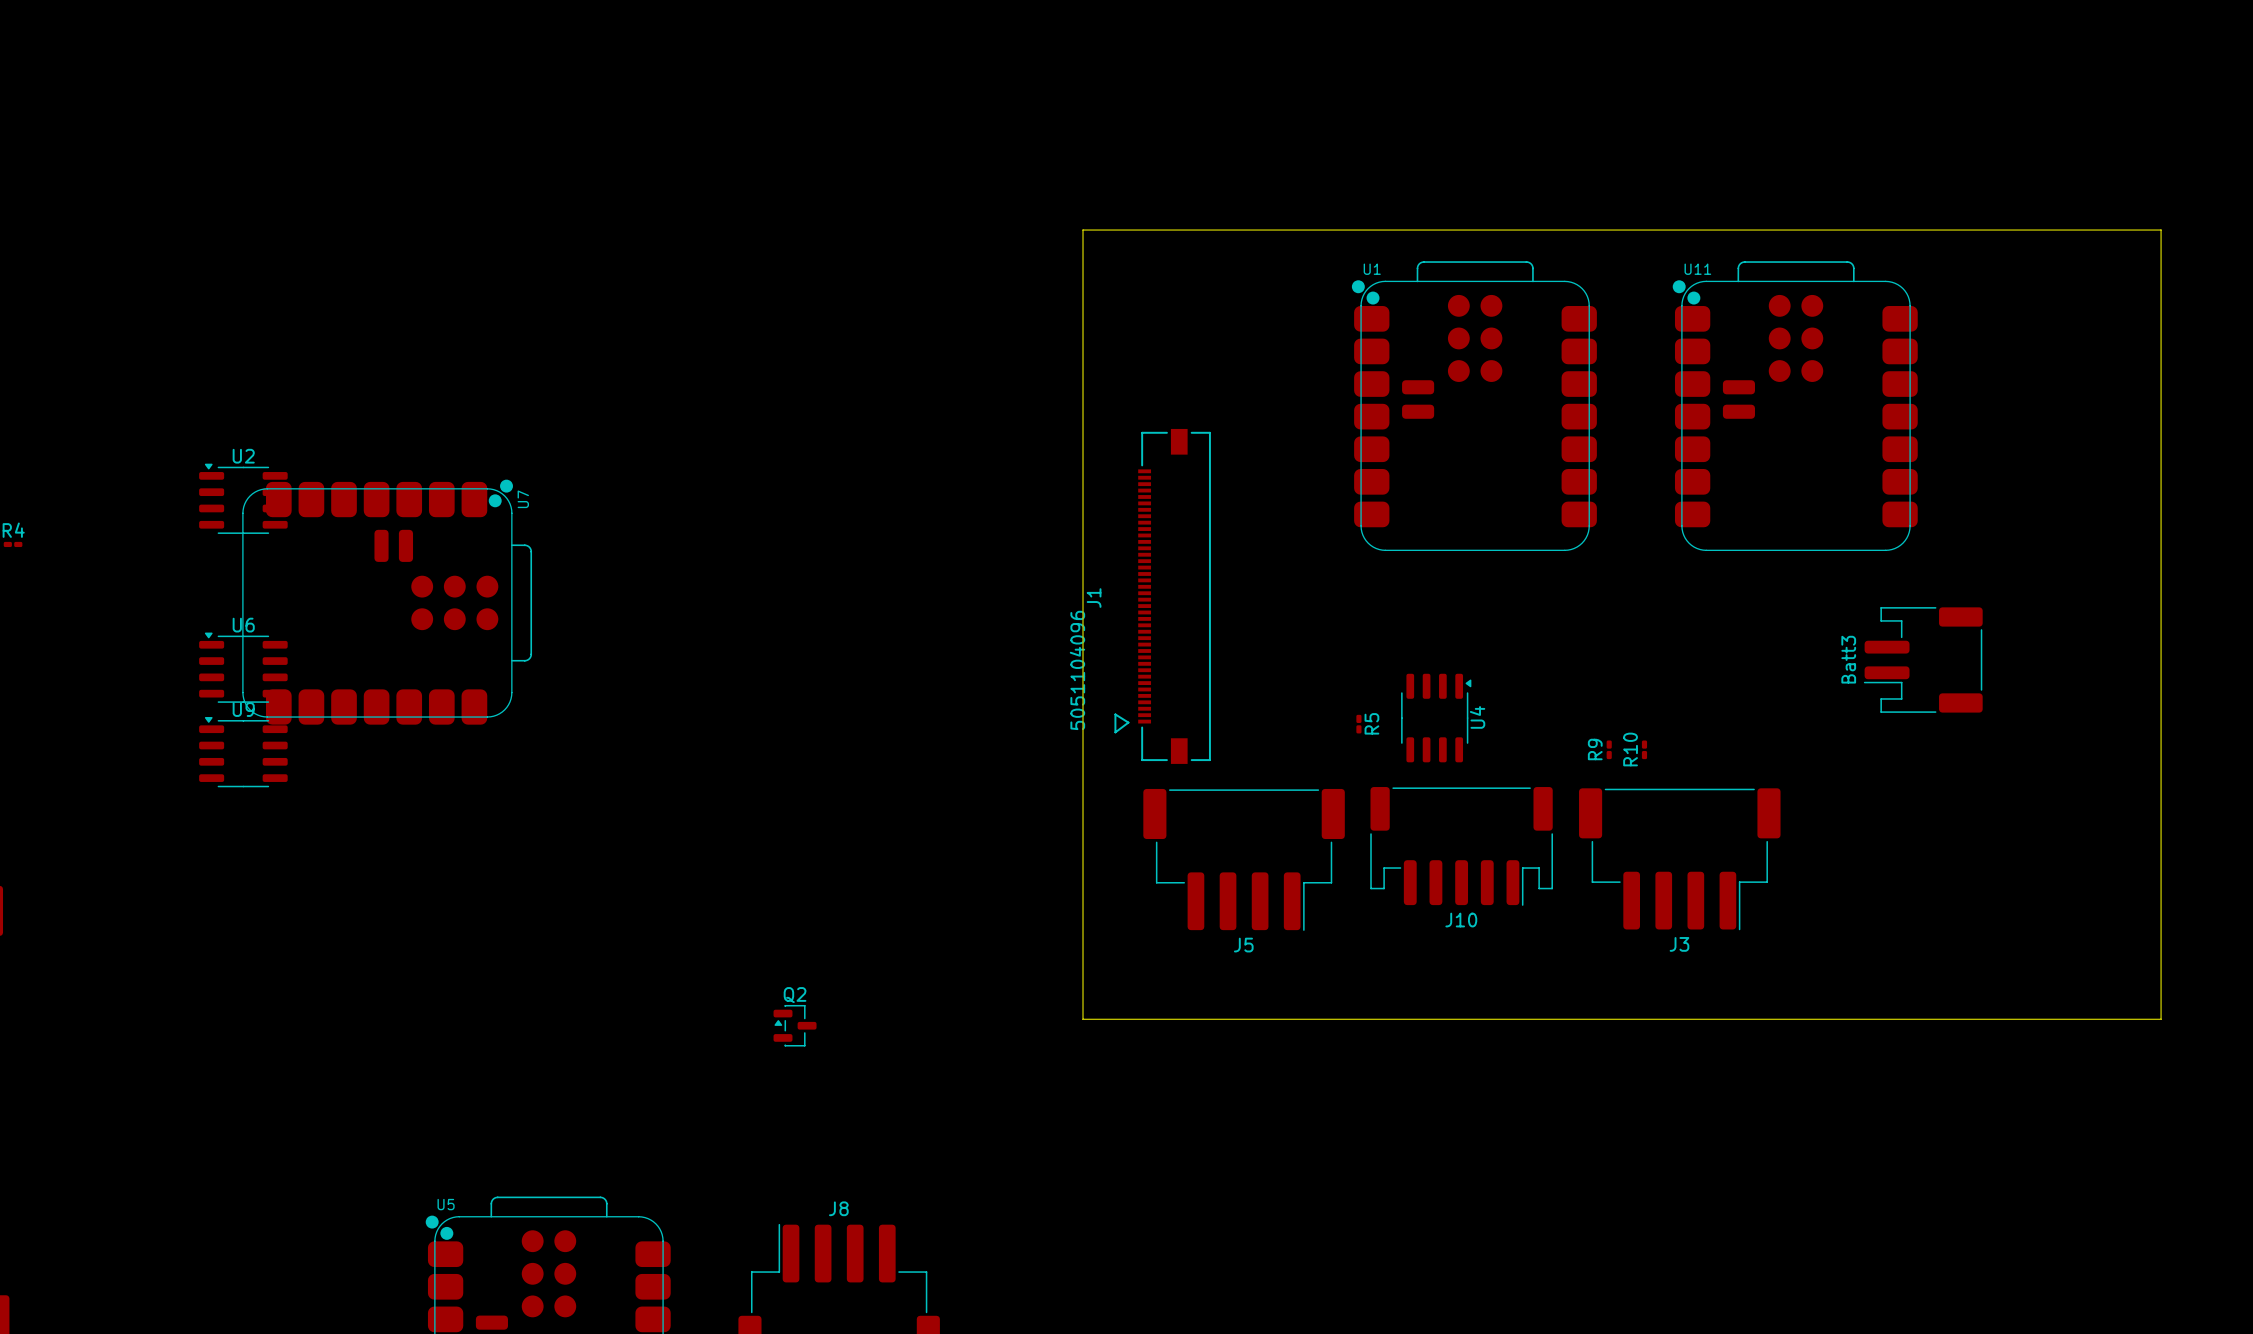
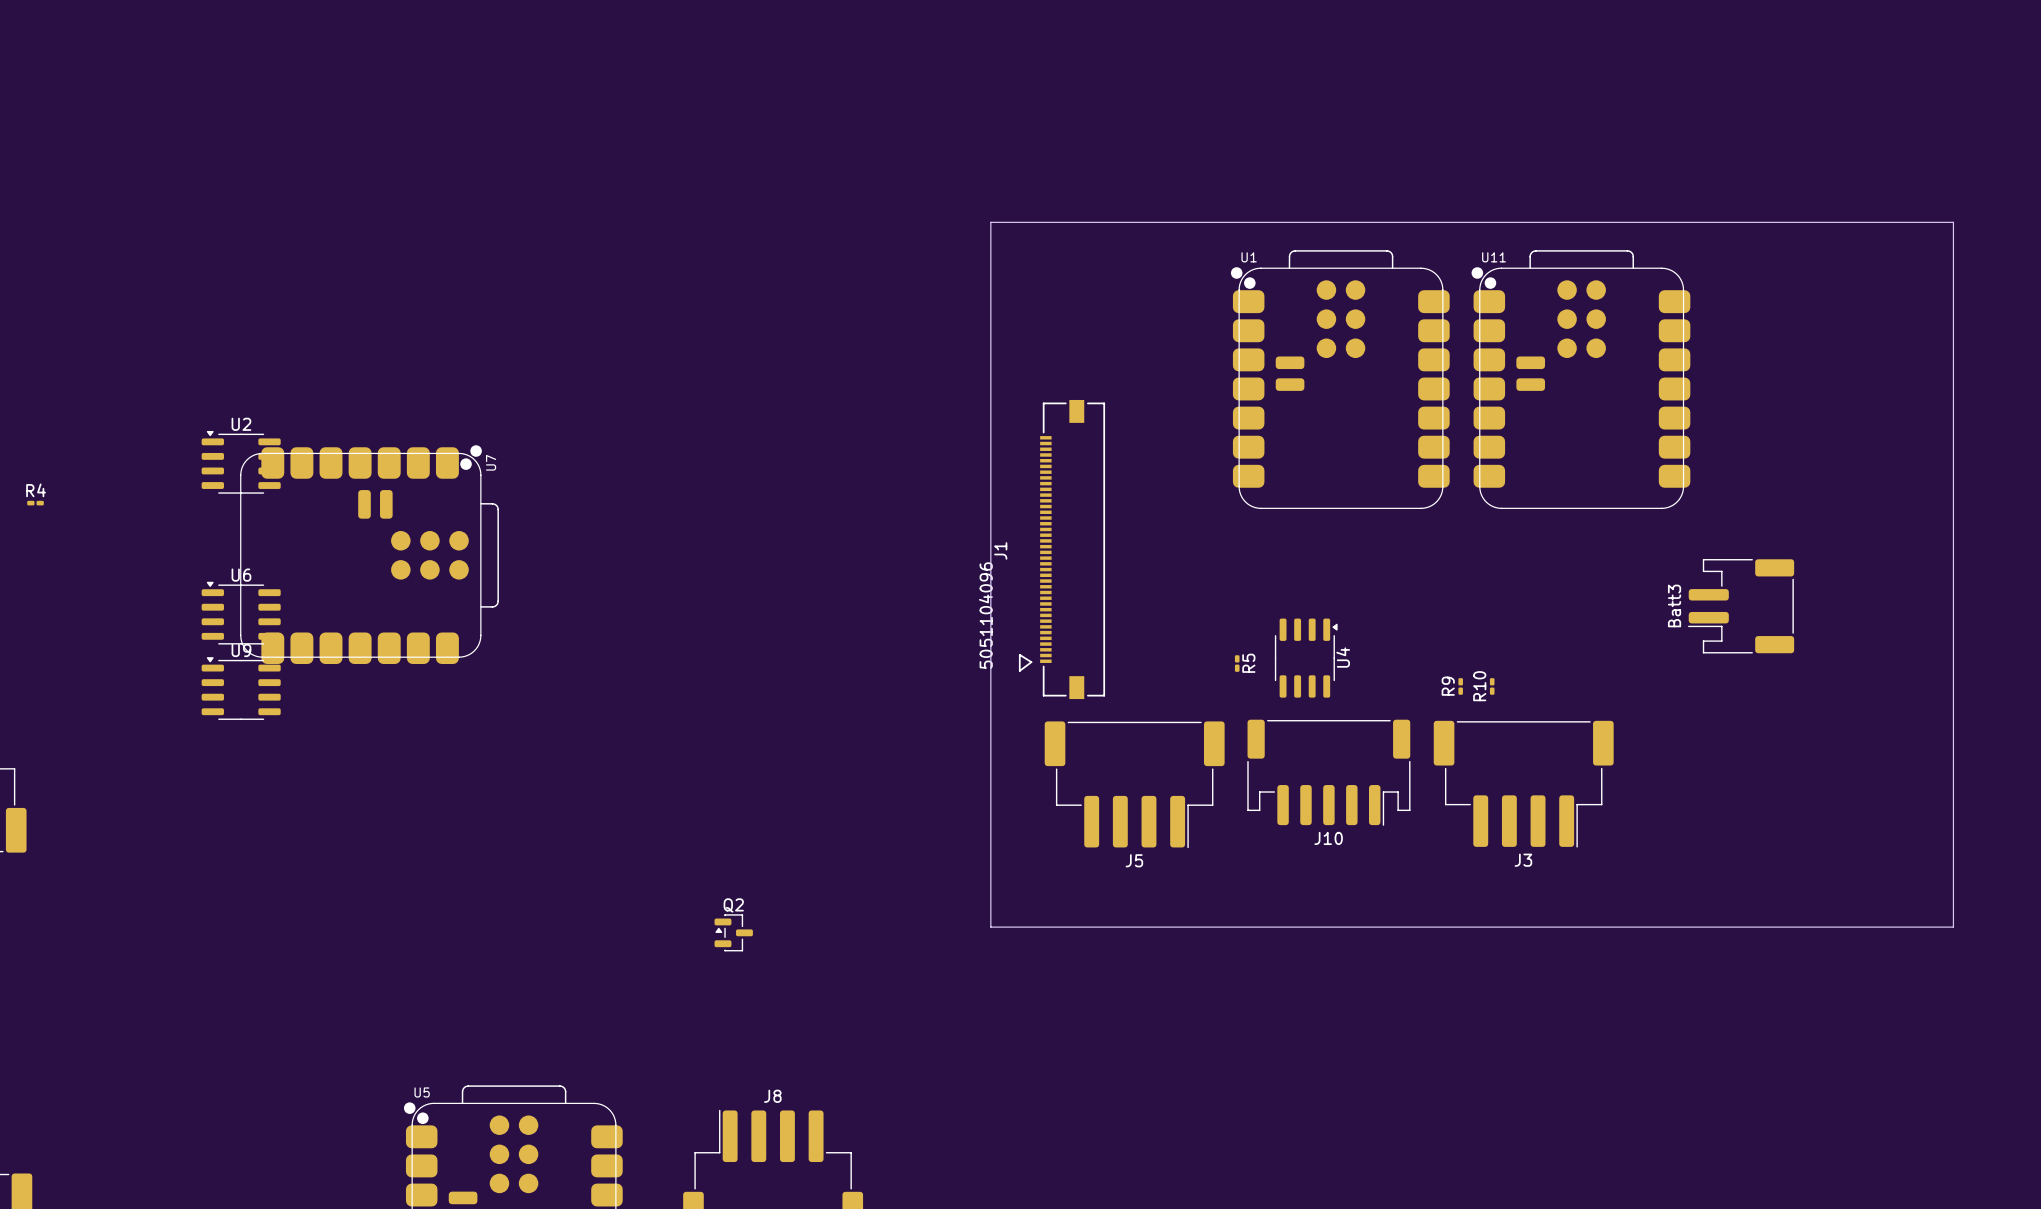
U11 position: (1795, 406) -> (1580, 379)

